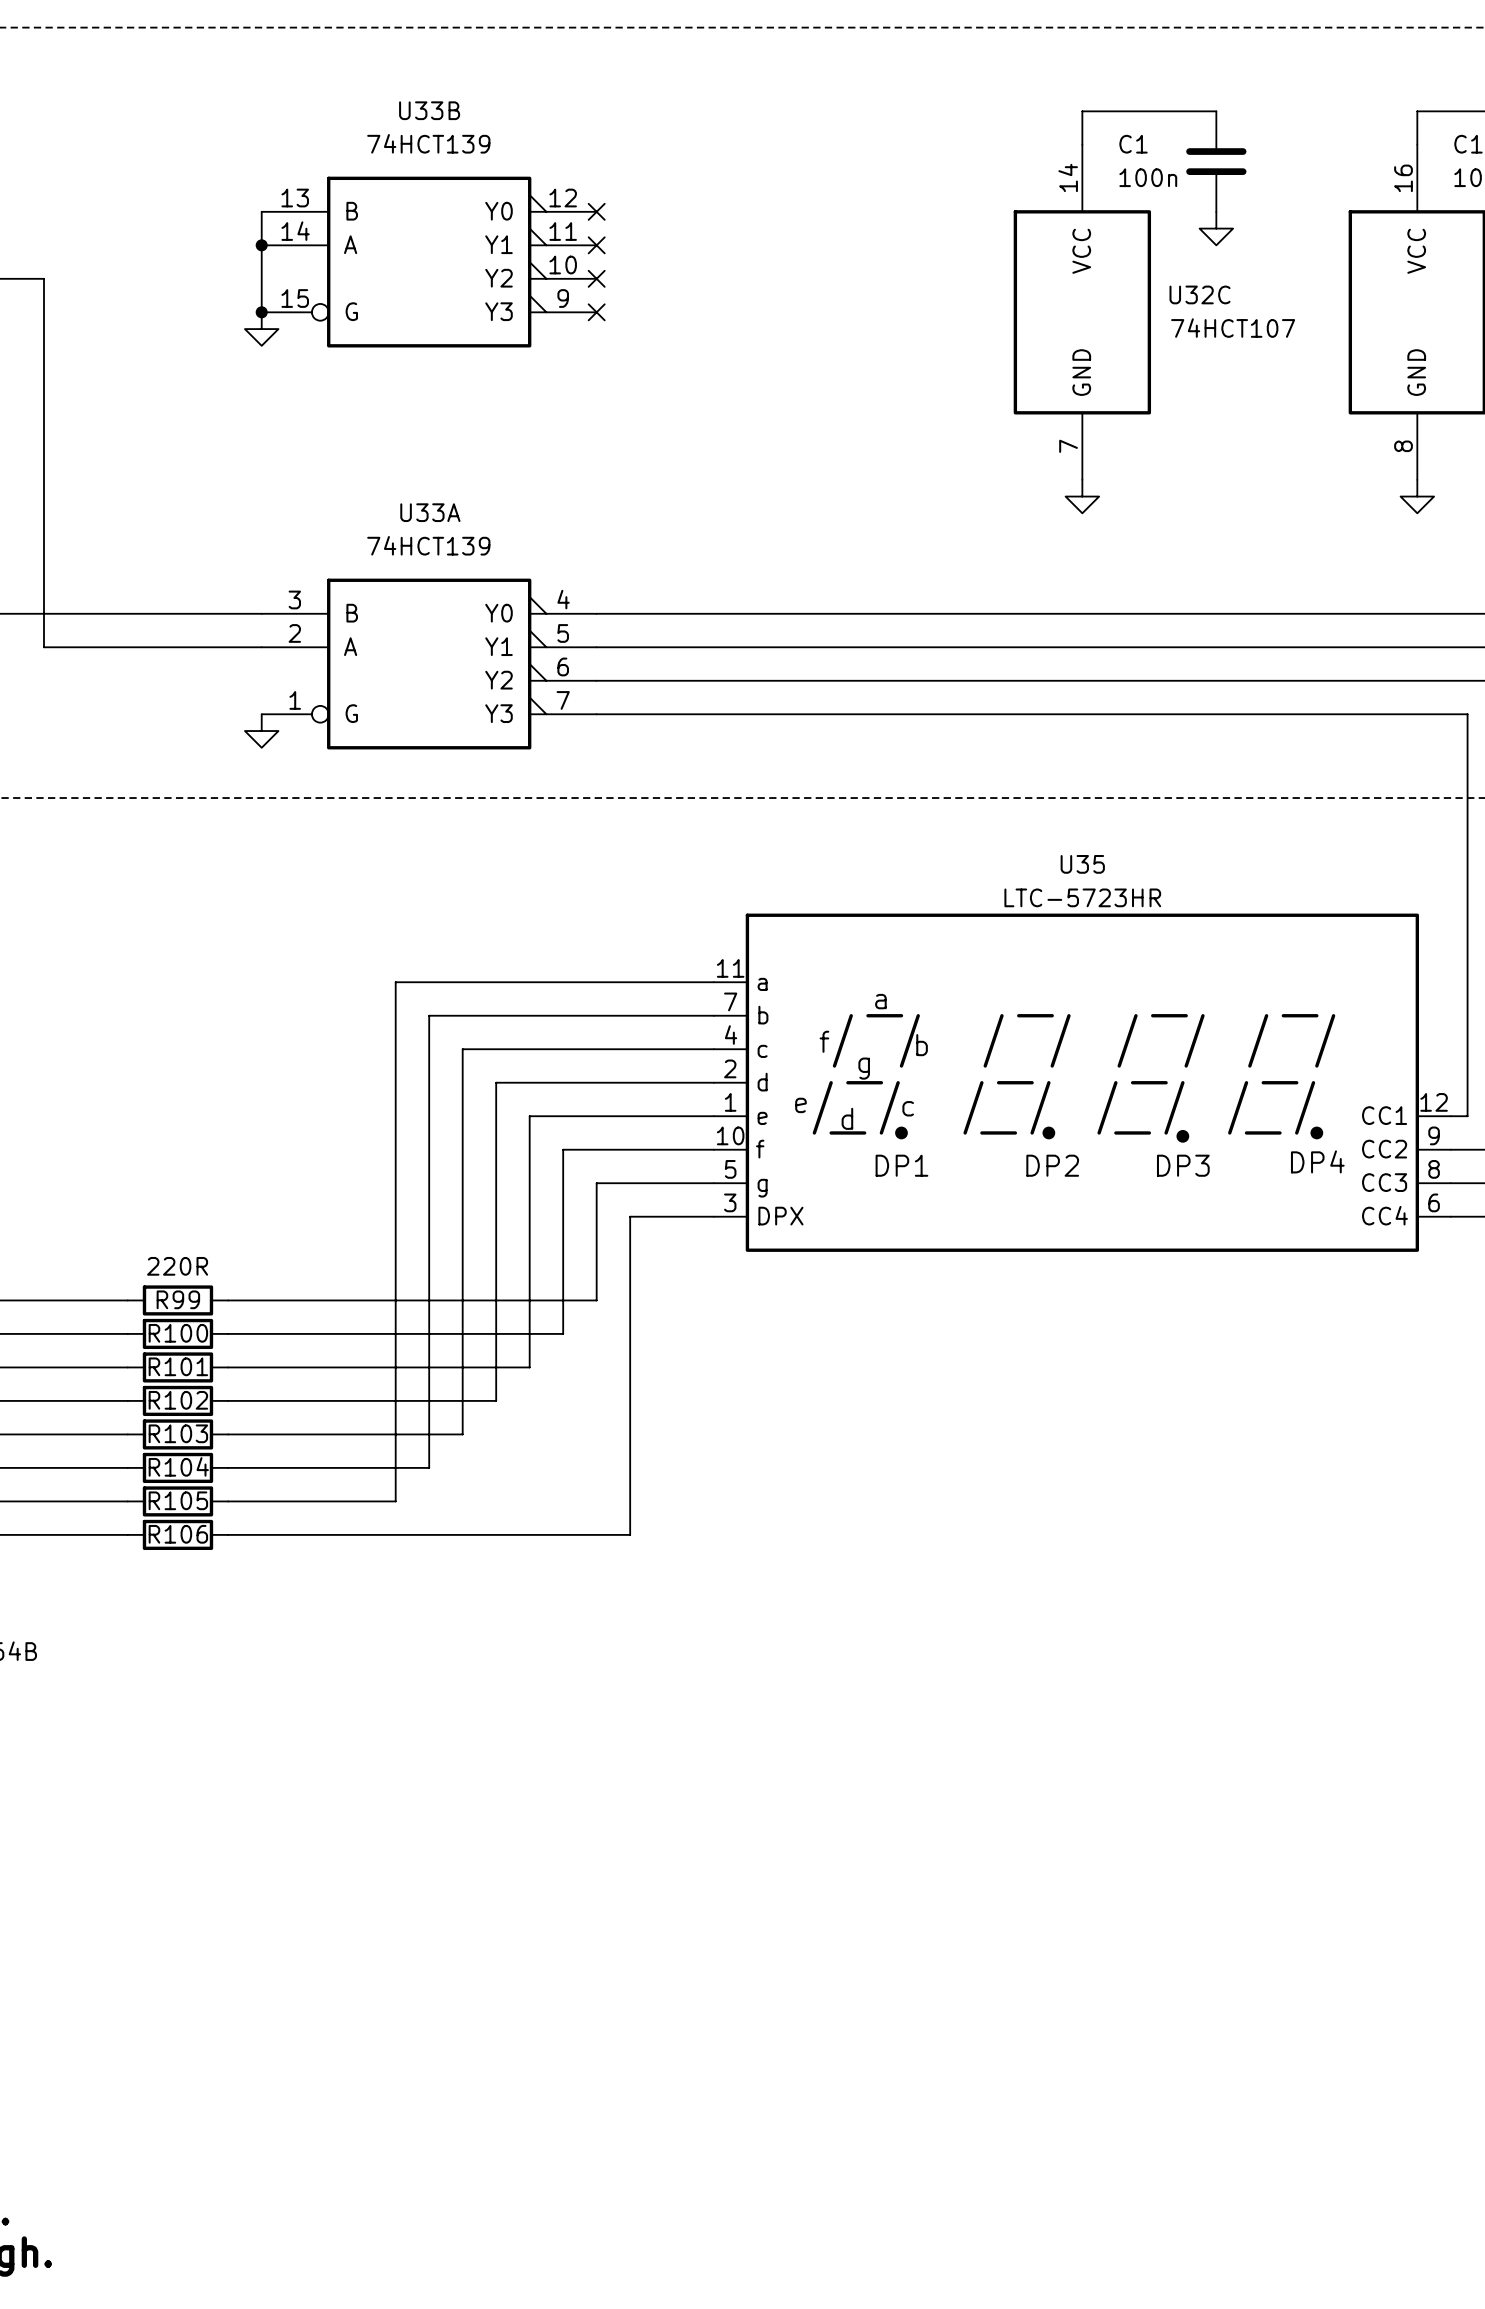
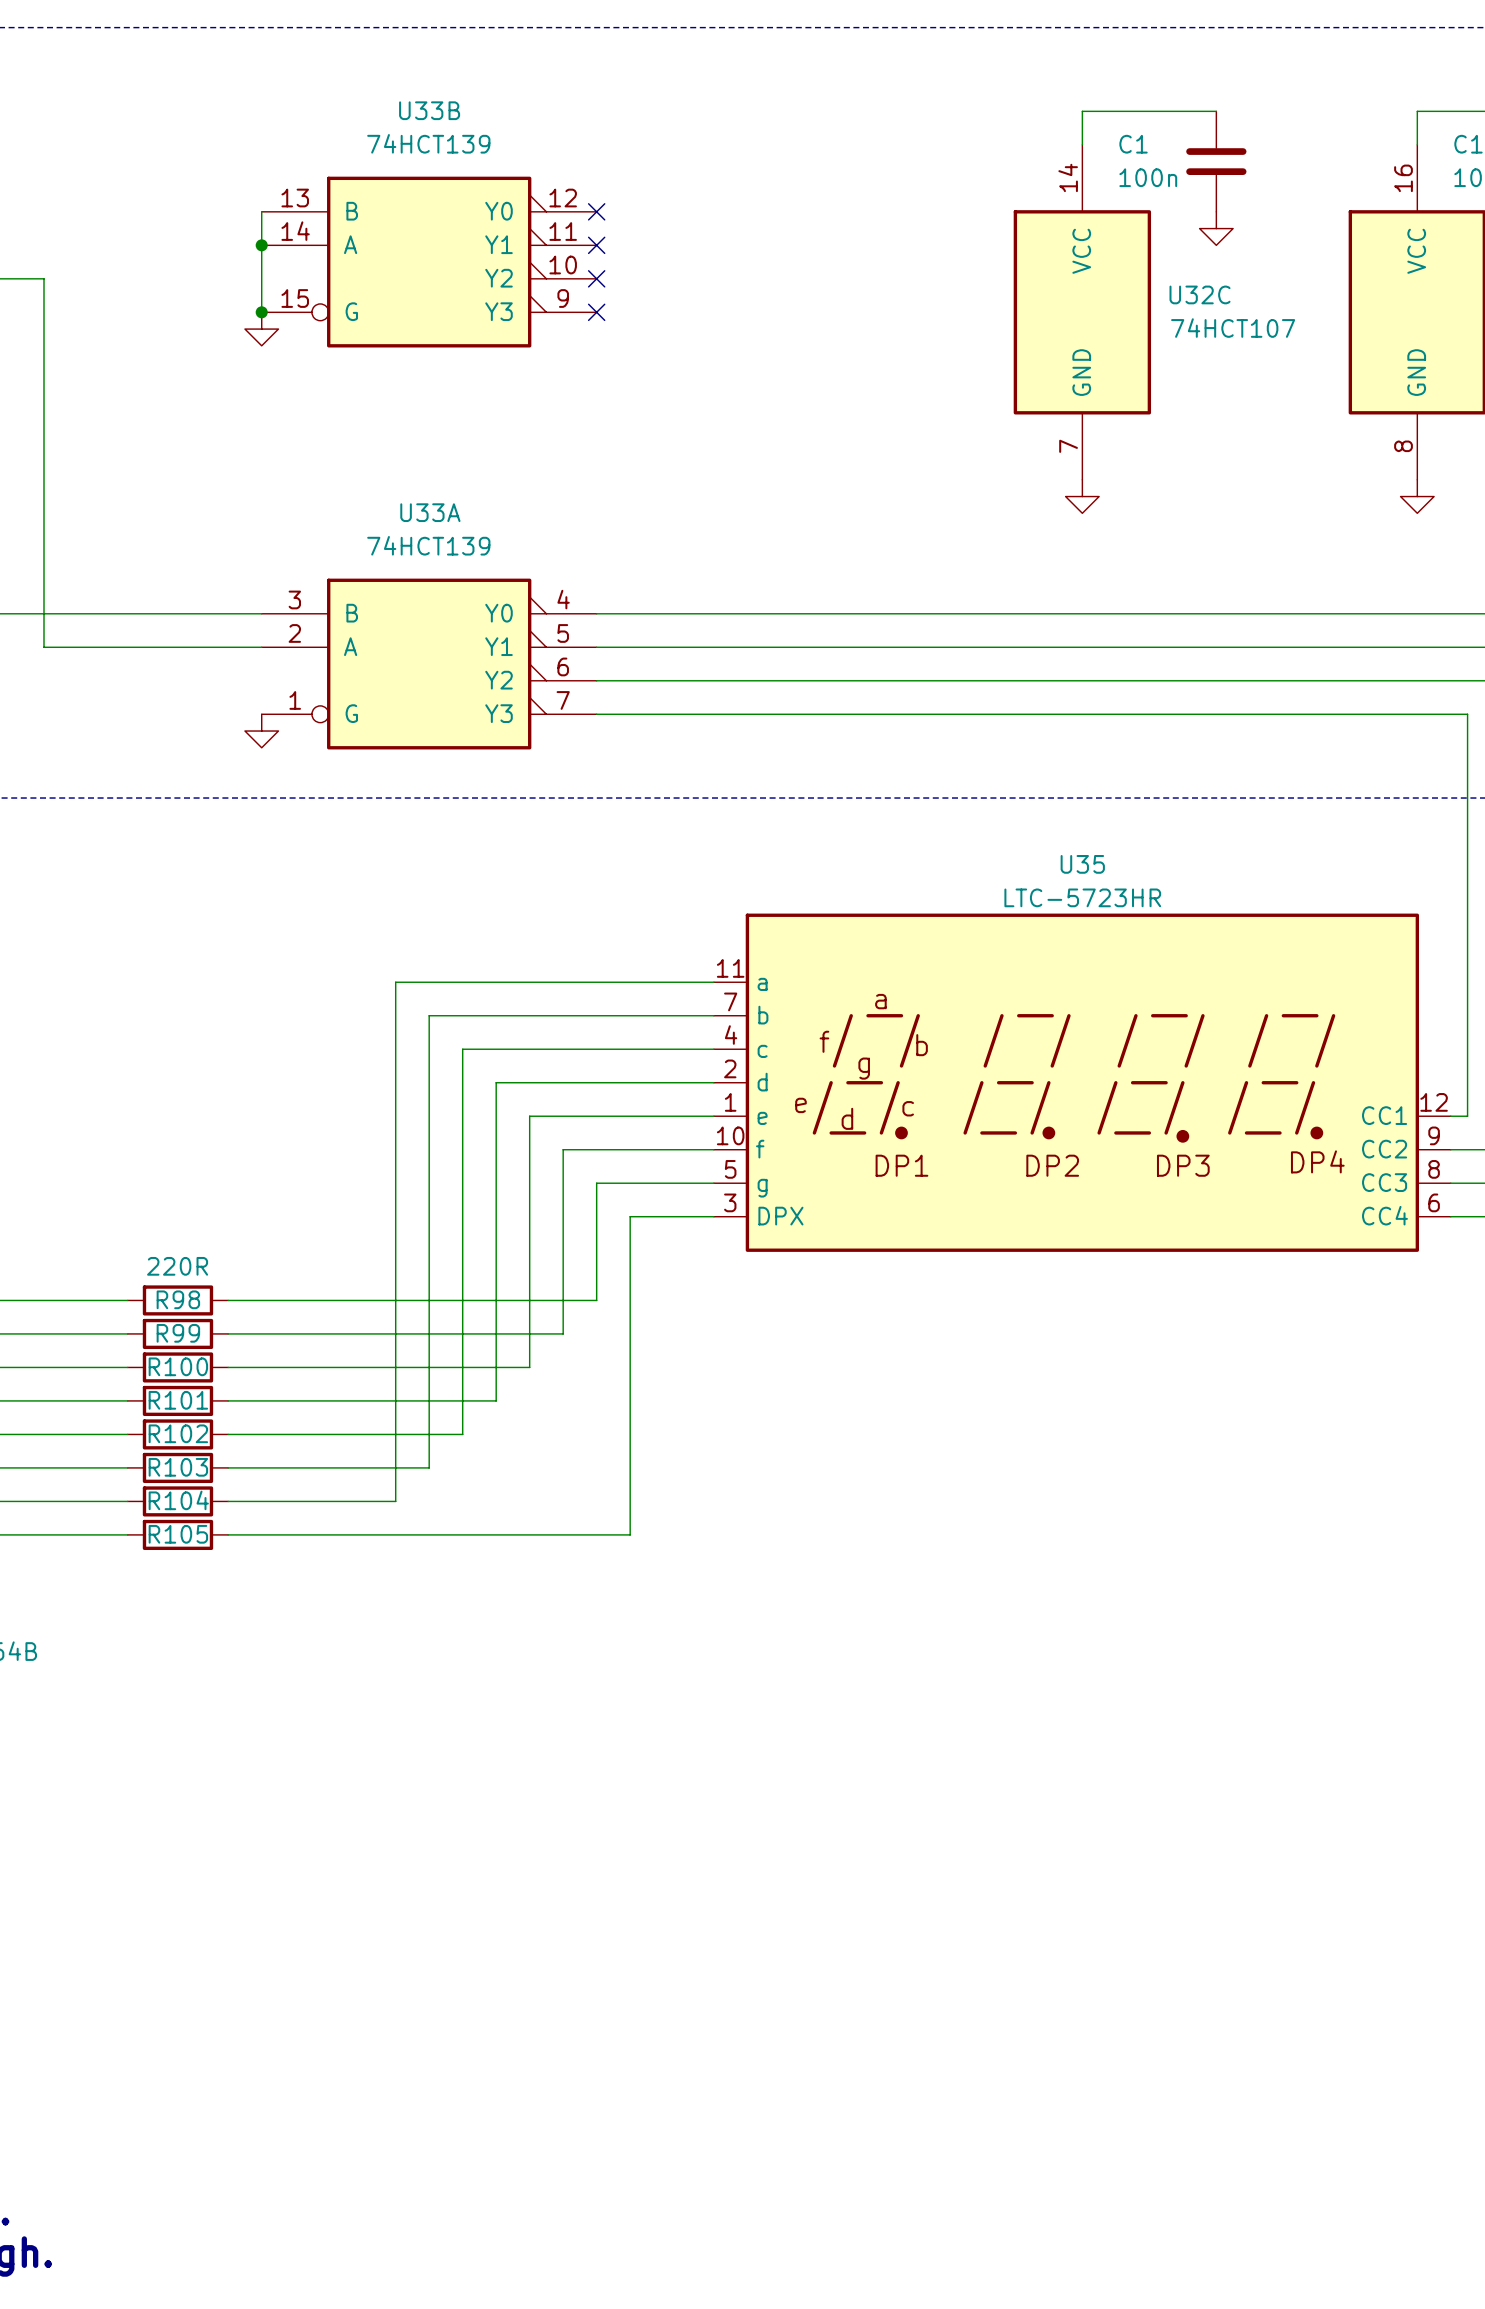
R99 name: R99 (178, 1299) -> R98 (178, 1299)
R100 name: R100 (178, 1333) -> R99 (178, 1333)
R101 name: R101 (178, 1366) -> R100 (178, 1366)
R102 name: R102 (178, 1400) -> R101 (178, 1400)
R103 name: R103 (178, 1433) -> R102 (178, 1433)
R104 name: R104 (178, 1466) -> R103 (178, 1467)
R105 name: R105 (178, 1500) -> R104 (178, 1500)
R106 name: R106 (178, 1534) -> R105 (178, 1534)

